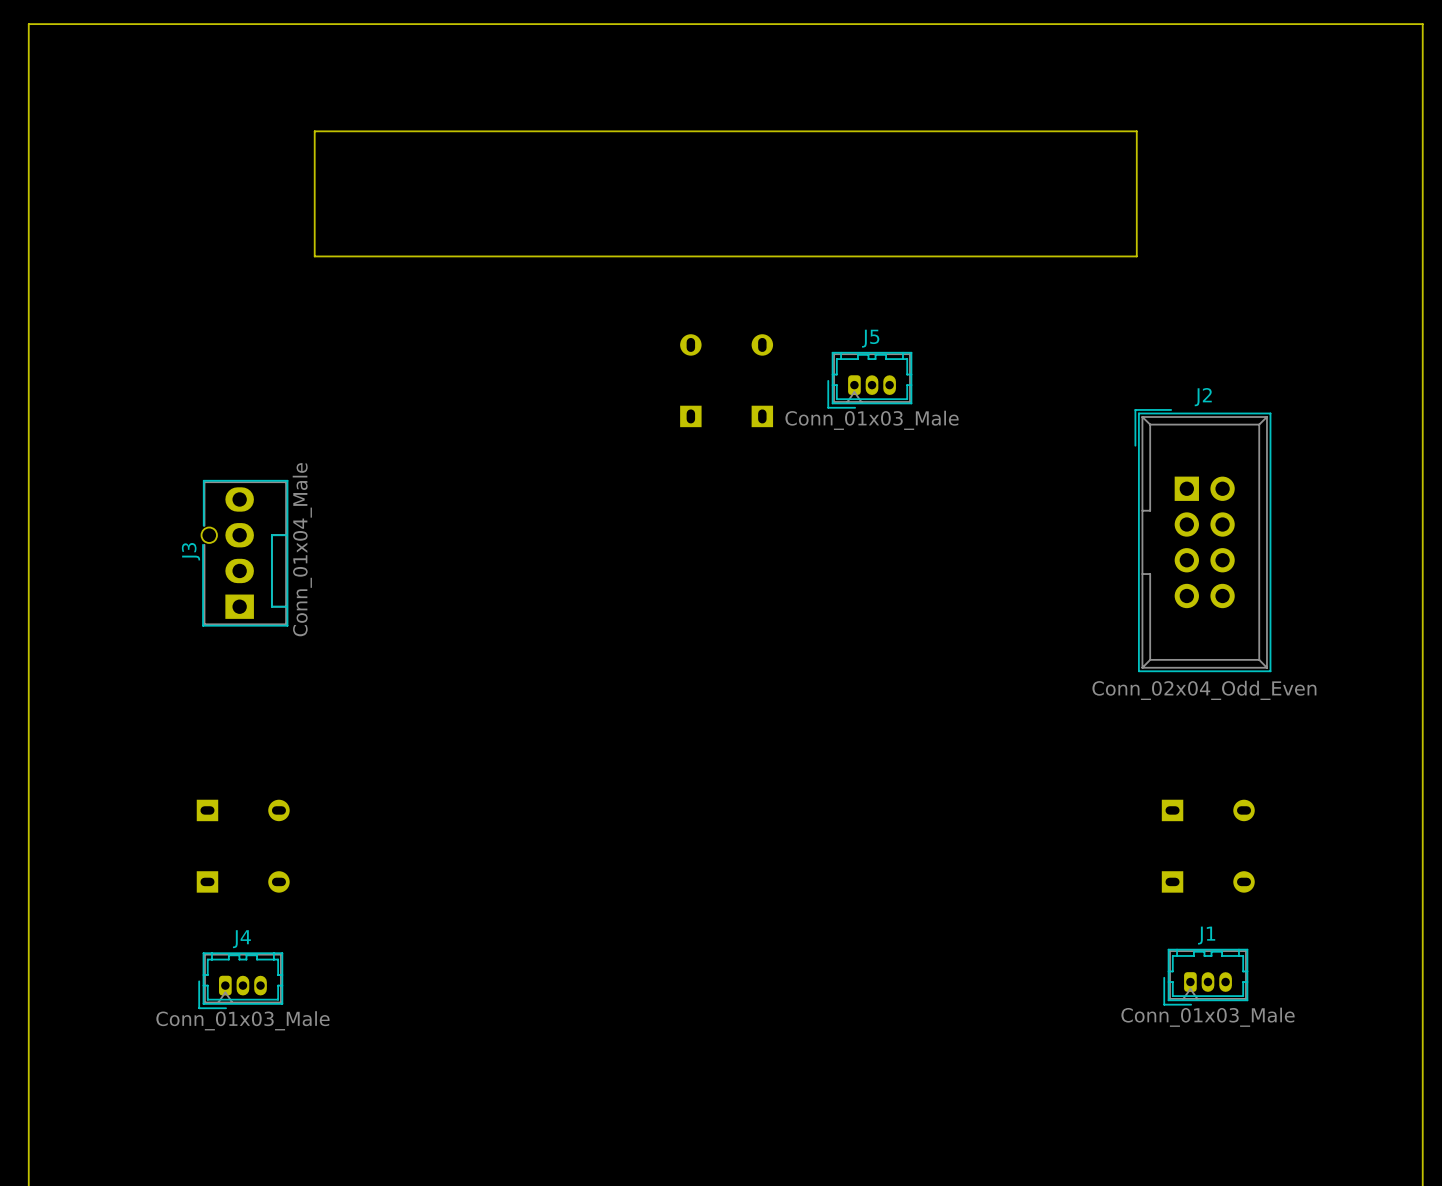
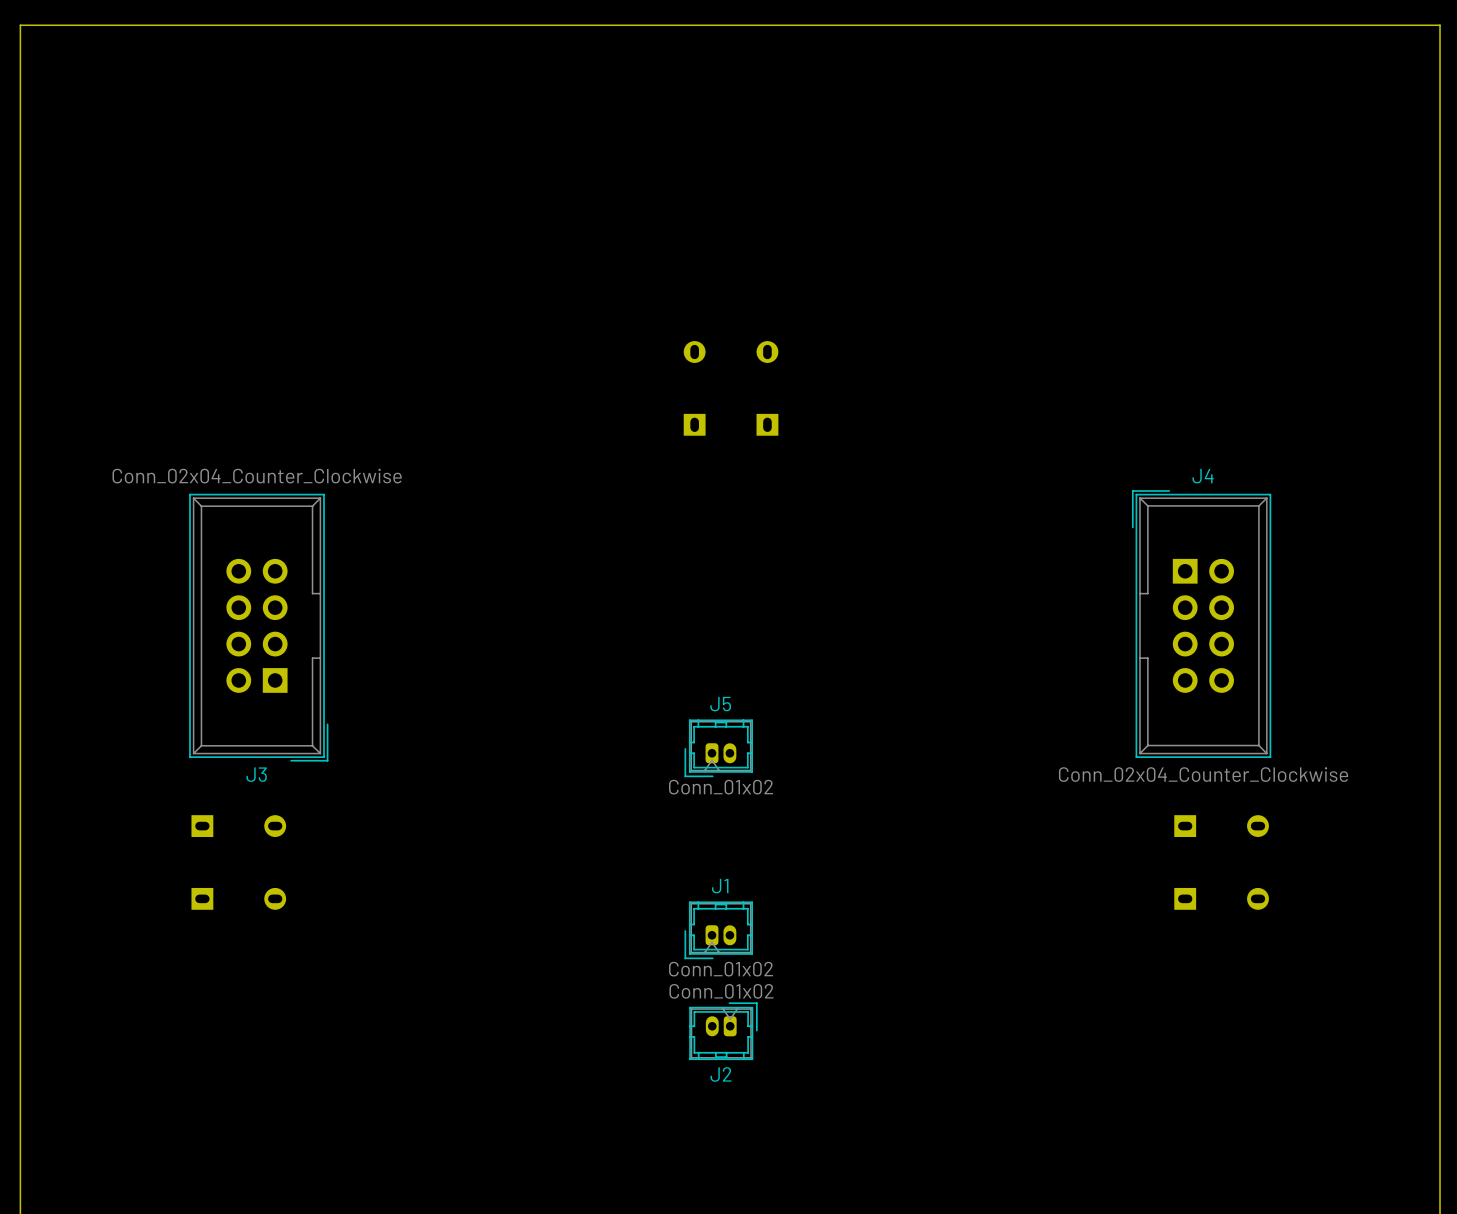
board edge: (314, 131) (1136, 131) (1136, 256) (314, 256) (314, 131) -> none
J5 footprint: [827, 351, 913, 409] -> [684, 719, 753, 778]
J2 name position: J2 (1203, 397) -> J2 (721, 1074)
J2 footprint: [1134, 409, 1272, 673] -> [689, 1002, 758, 1061]
J5 value: Conn_01x03_Male (872, 420) -> Conn_01x02 (721, 787)
J3 footprint: [201, 479, 289, 627] -> [189, 493, 329, 762]
J3 value: Conn_01x04_Male (302, 549) -> Conn_02x04_Counter_Clockwise (257, 476)
J3 name position: J3 (190, 551) -> J3 (256, 774)
J2 value: Conn_02x04_Odd_Even (1204, 690) -> Conn_01x02 (721, 991)
J4 name position: J4 (241, 939) -> J4 (1203, 476)
J1 footprint: [1163, 948, 1249, 1006] -> [684, 901, 753, 960]
J4 footprint: [198, 952, 284, 1010] -> [1131, 490, 1272, 759]
J1 value: Conn_01x03_Male (1208, 1017) -> Conn_01x02 (721, 969)
J4 value: Conn_01x03_Male (242, 1020) -> Conn_02x04_Counter_Clockwise (1203, 774)

